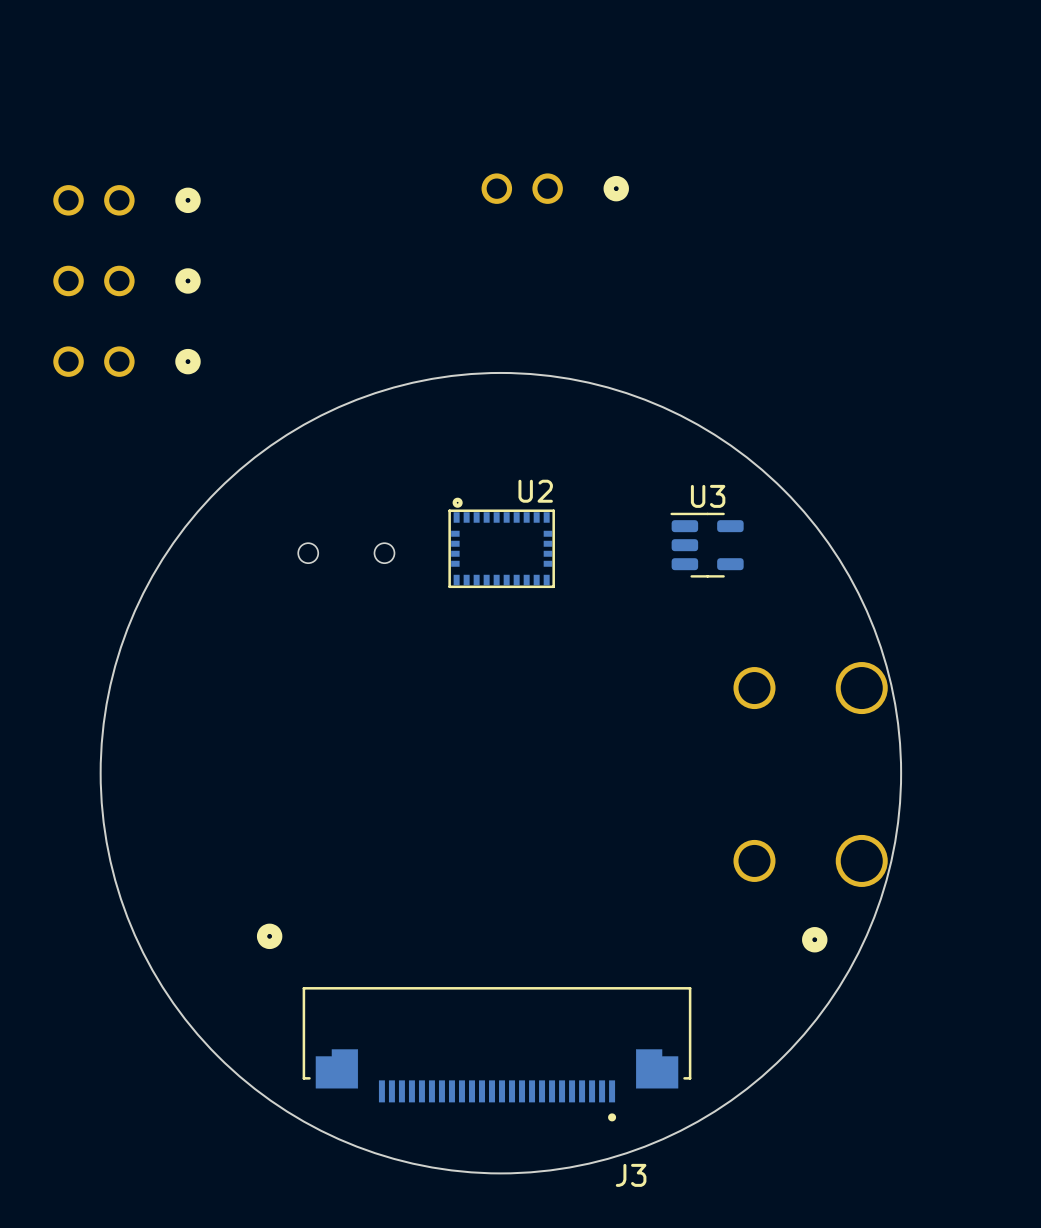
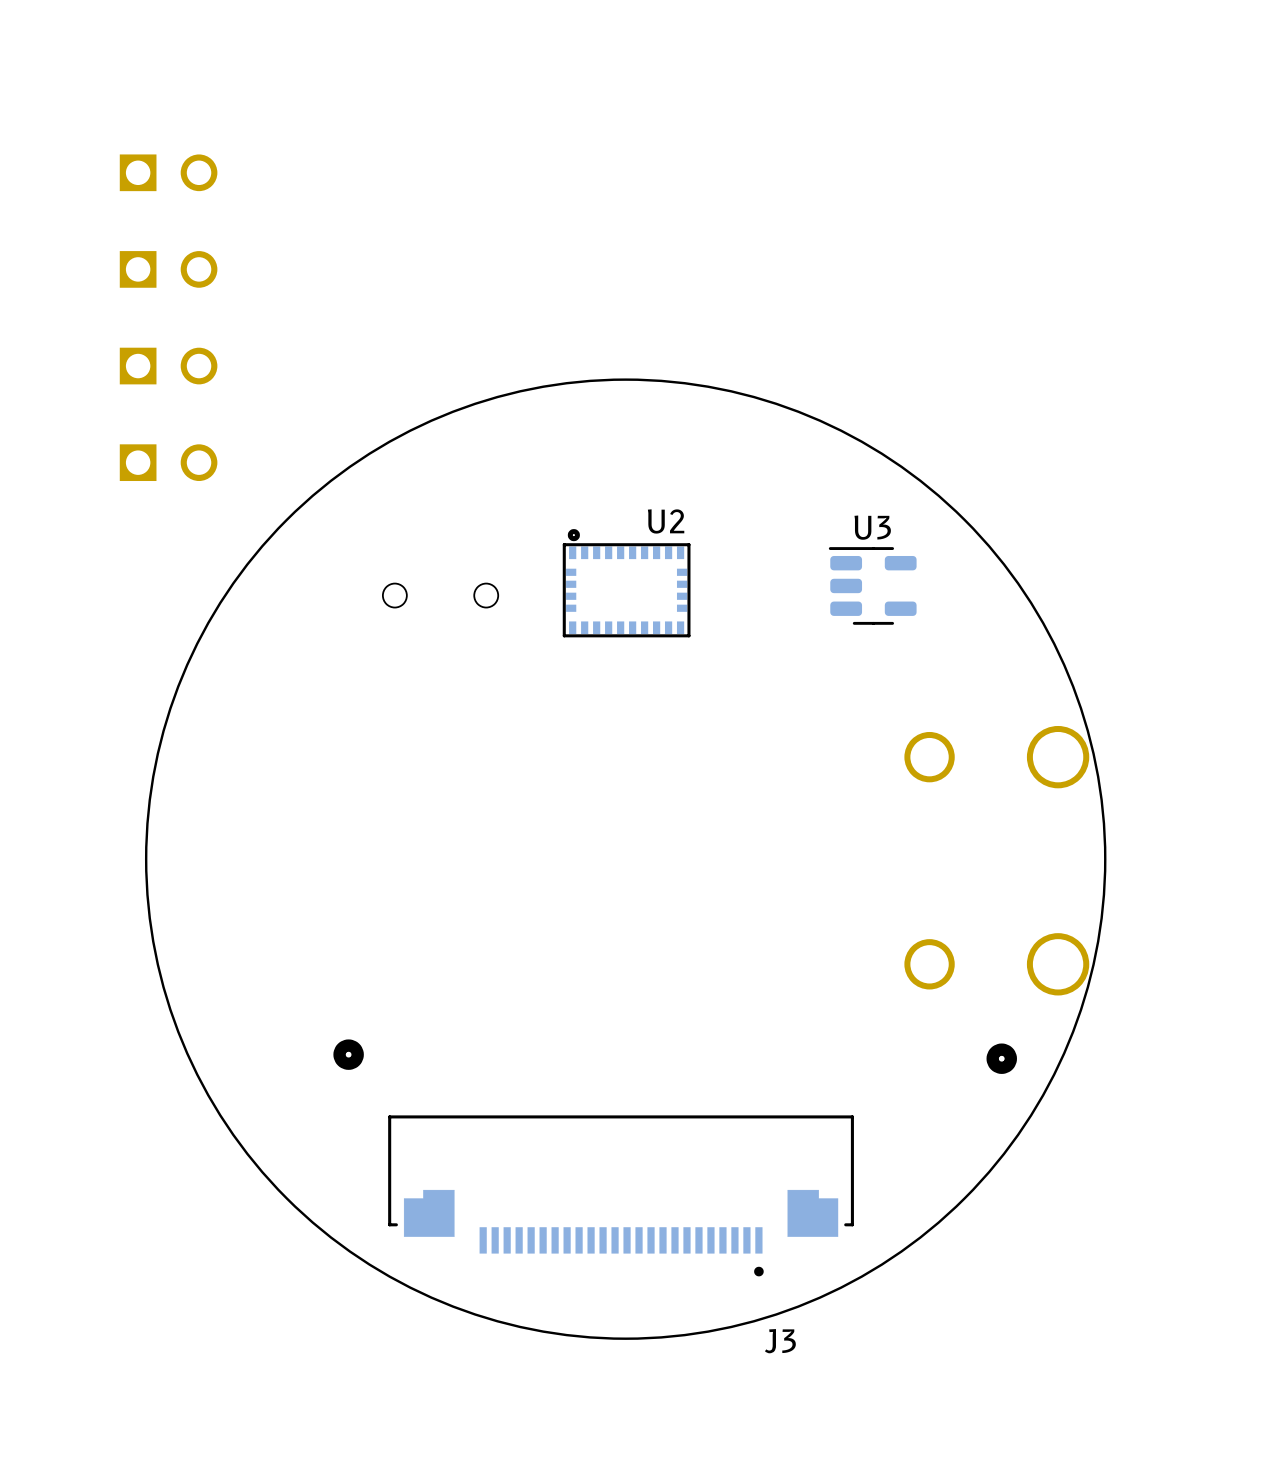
part footprint: [53, 185, 201, 216] -> [119, 154, 218, 192]
part: (555, 188) -> none
part footprint: [53, 265, 201, 297] -> [119, 251, 218, 288]
part footprint: [53, 346, 201, 377] -> [119, 347, 218, 385]
part: none -> (168, 462)

